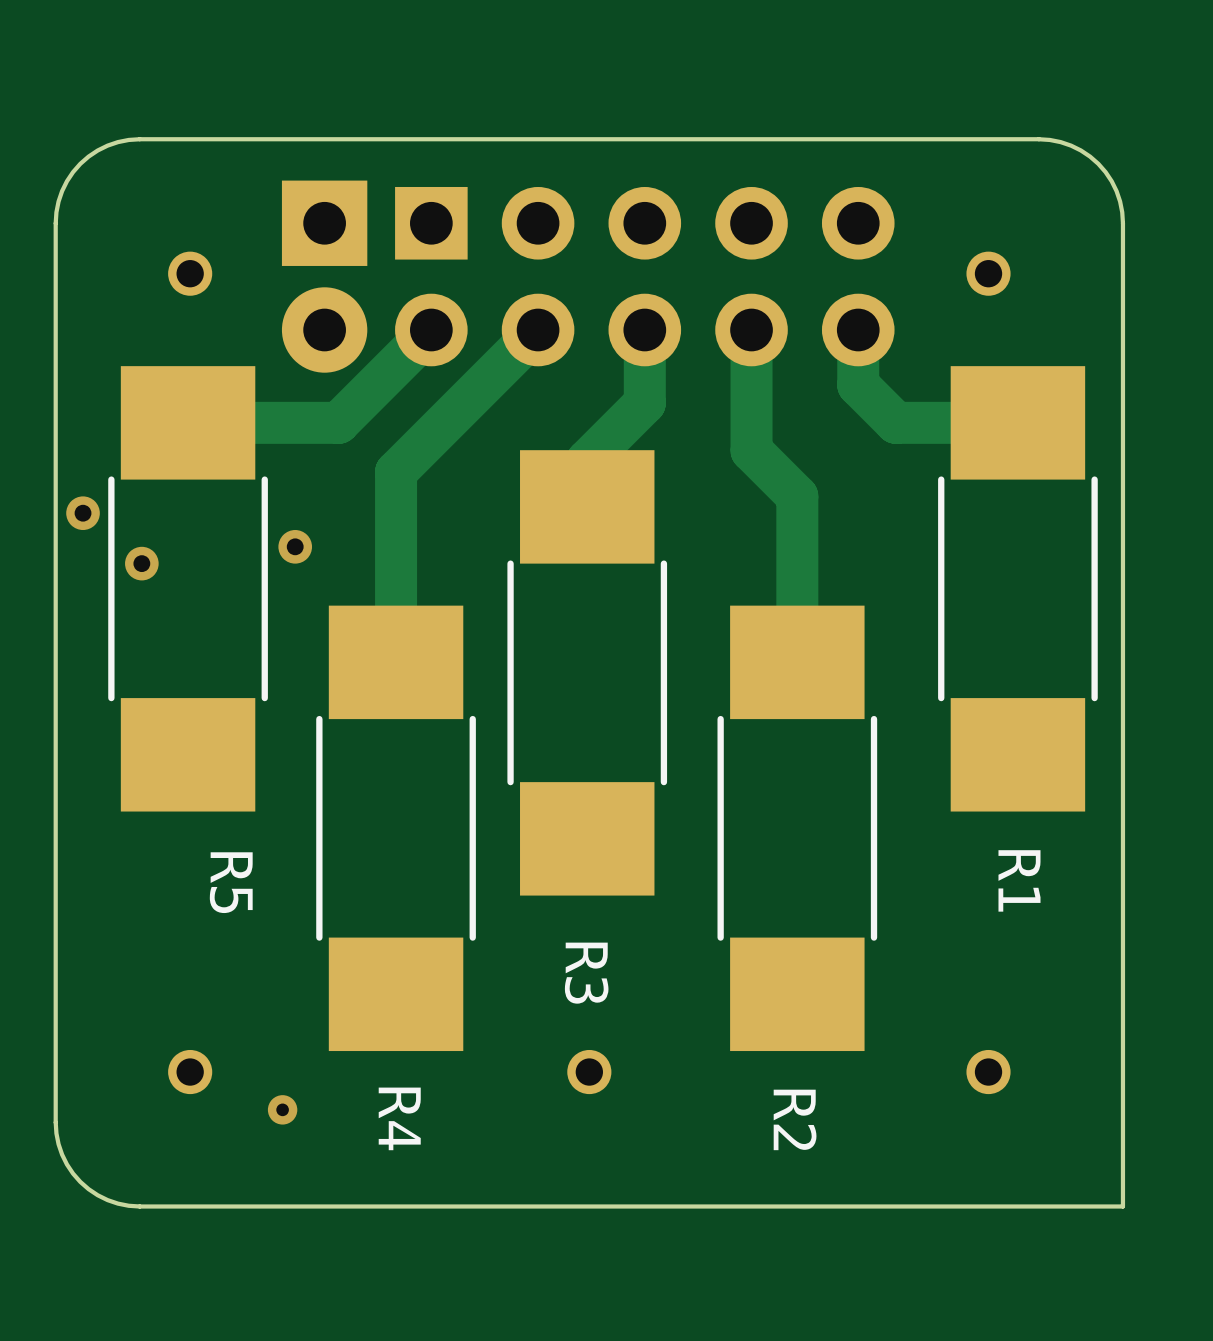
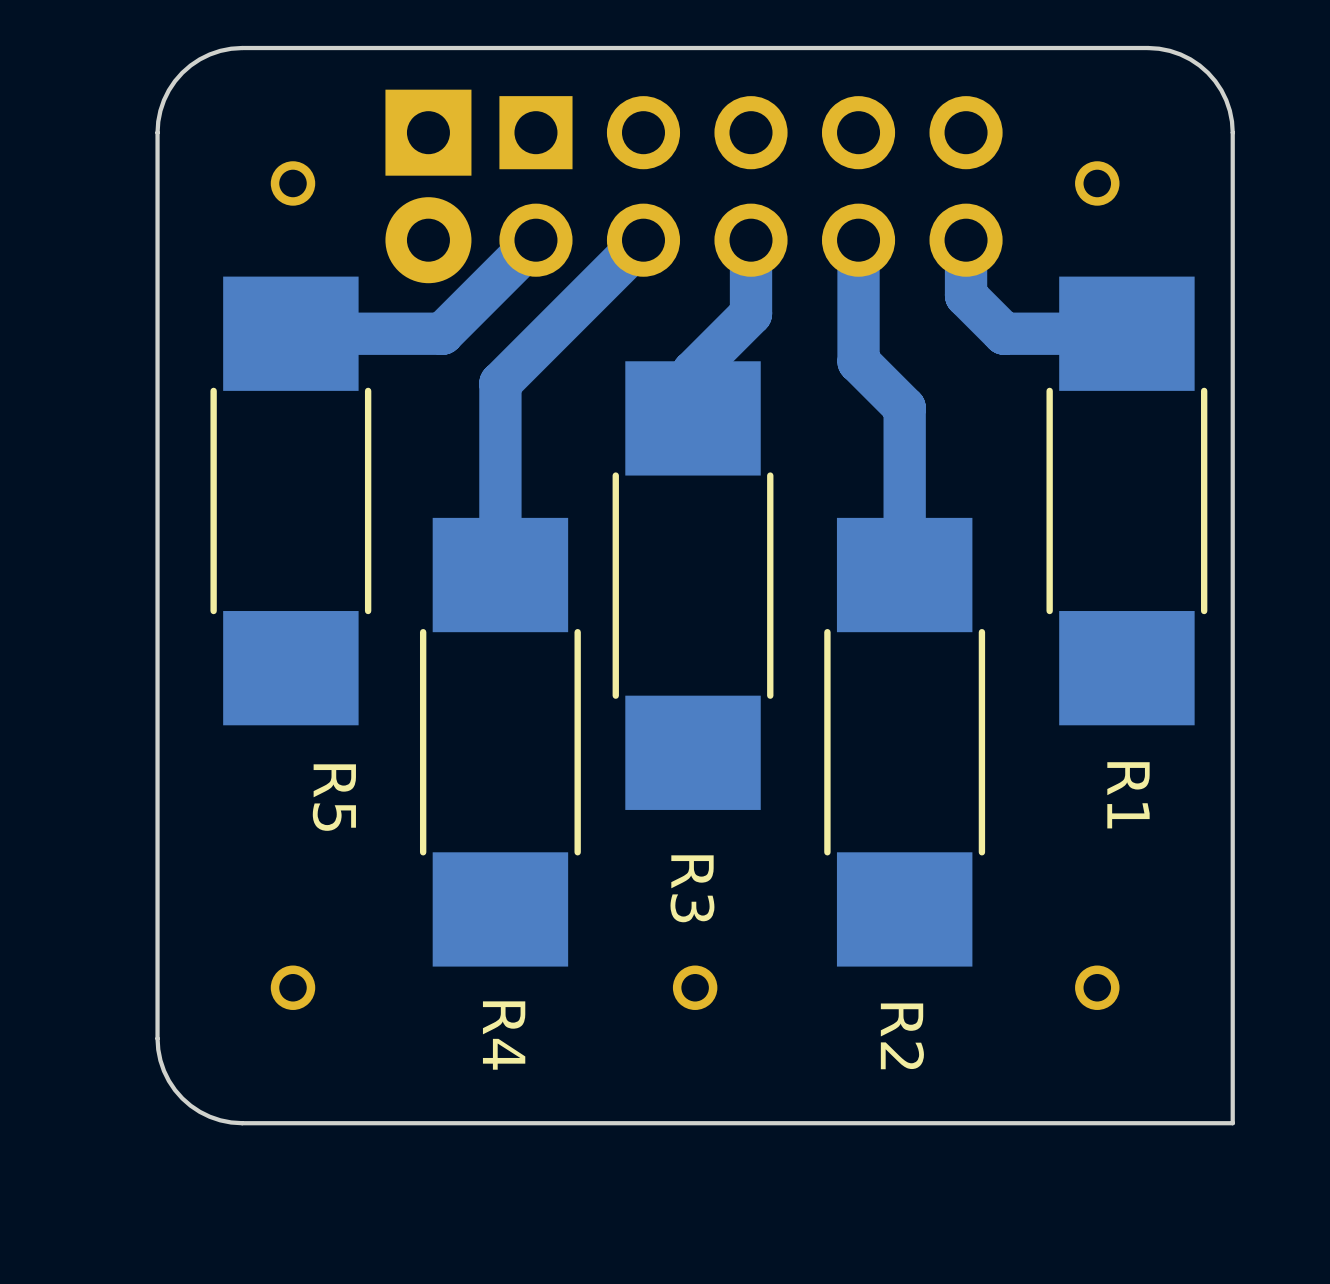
via: (83, 513) -> none
via: (295, 546) -> none
via: (141, 563) -> none
via: (282, 1109) -> none

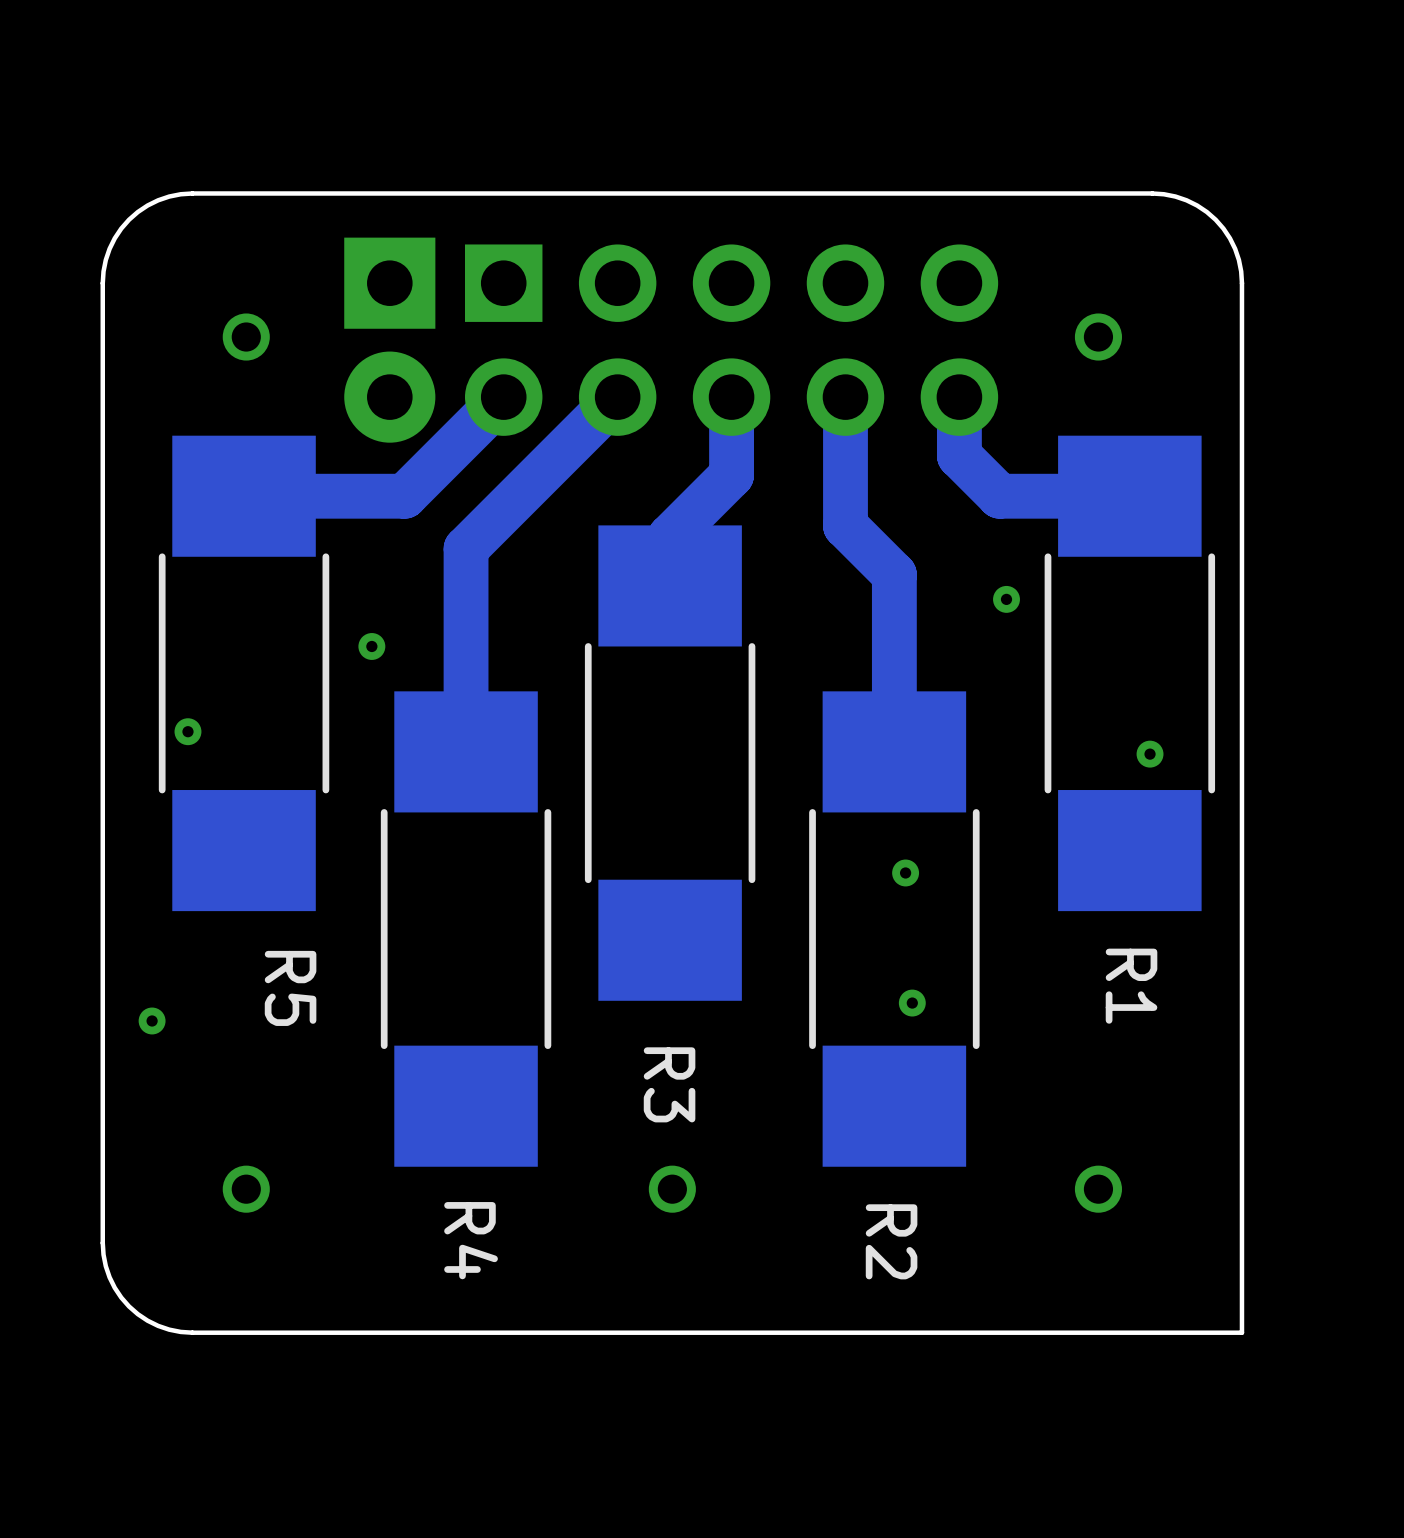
via: none -> (1006, 599)
via: none -> (371, 646)
via: none -> (187, 731)
via: none -> (1150, 754)
via: none -> (905, 872)
via: none -> (912, 1003)
via: none -> (152, 1020)

